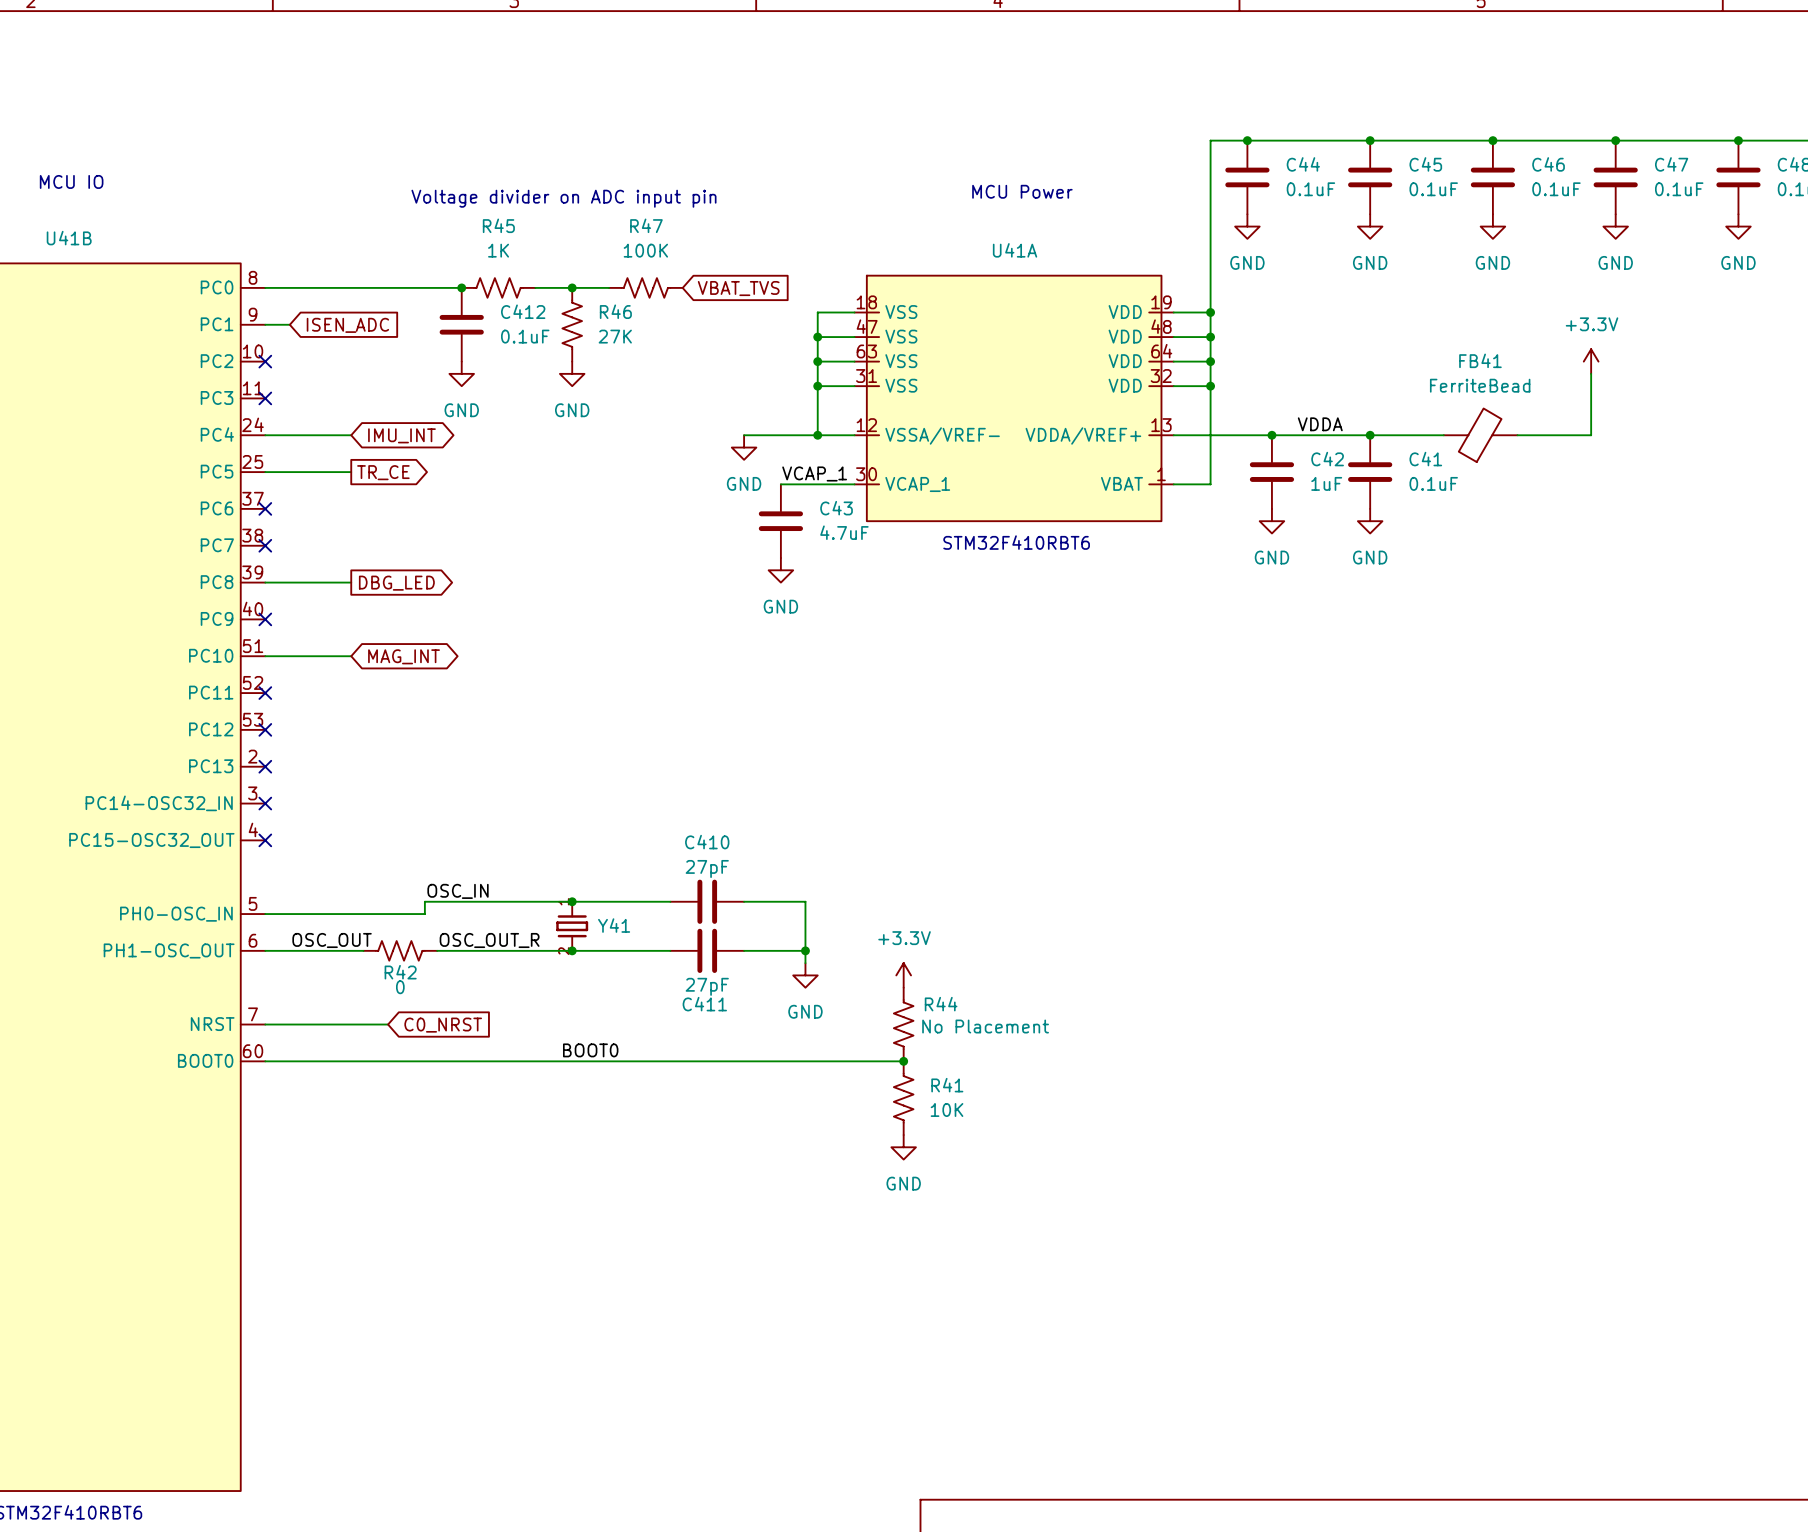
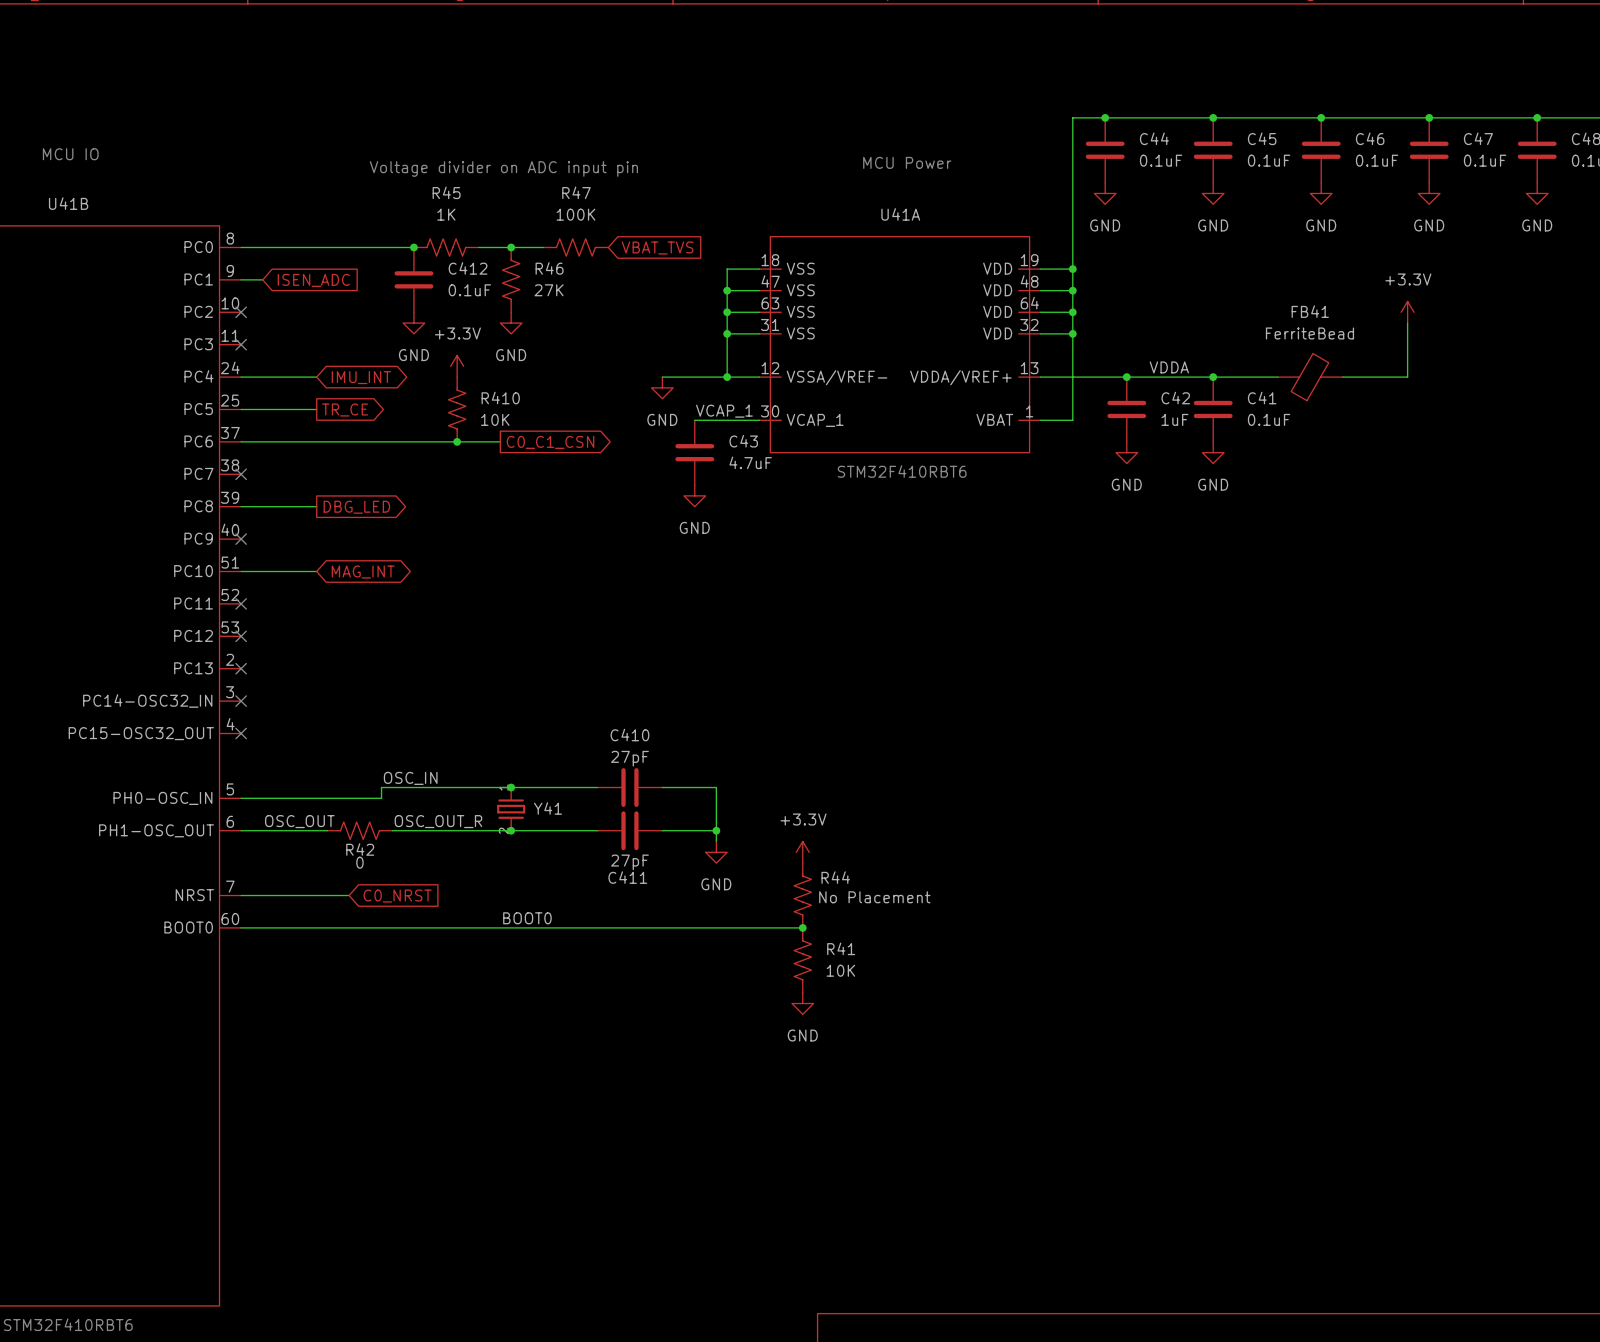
power symbol: none -> +3.3V (457, 366)
R410: none -> 10K (457, 409)
wire: none -> (241, 441) (500, 441)
no-connect mark: (265, 508) -> none
junction: none -> (457, 441)
global label: none -> C0_C1_CSN (550, 442)

